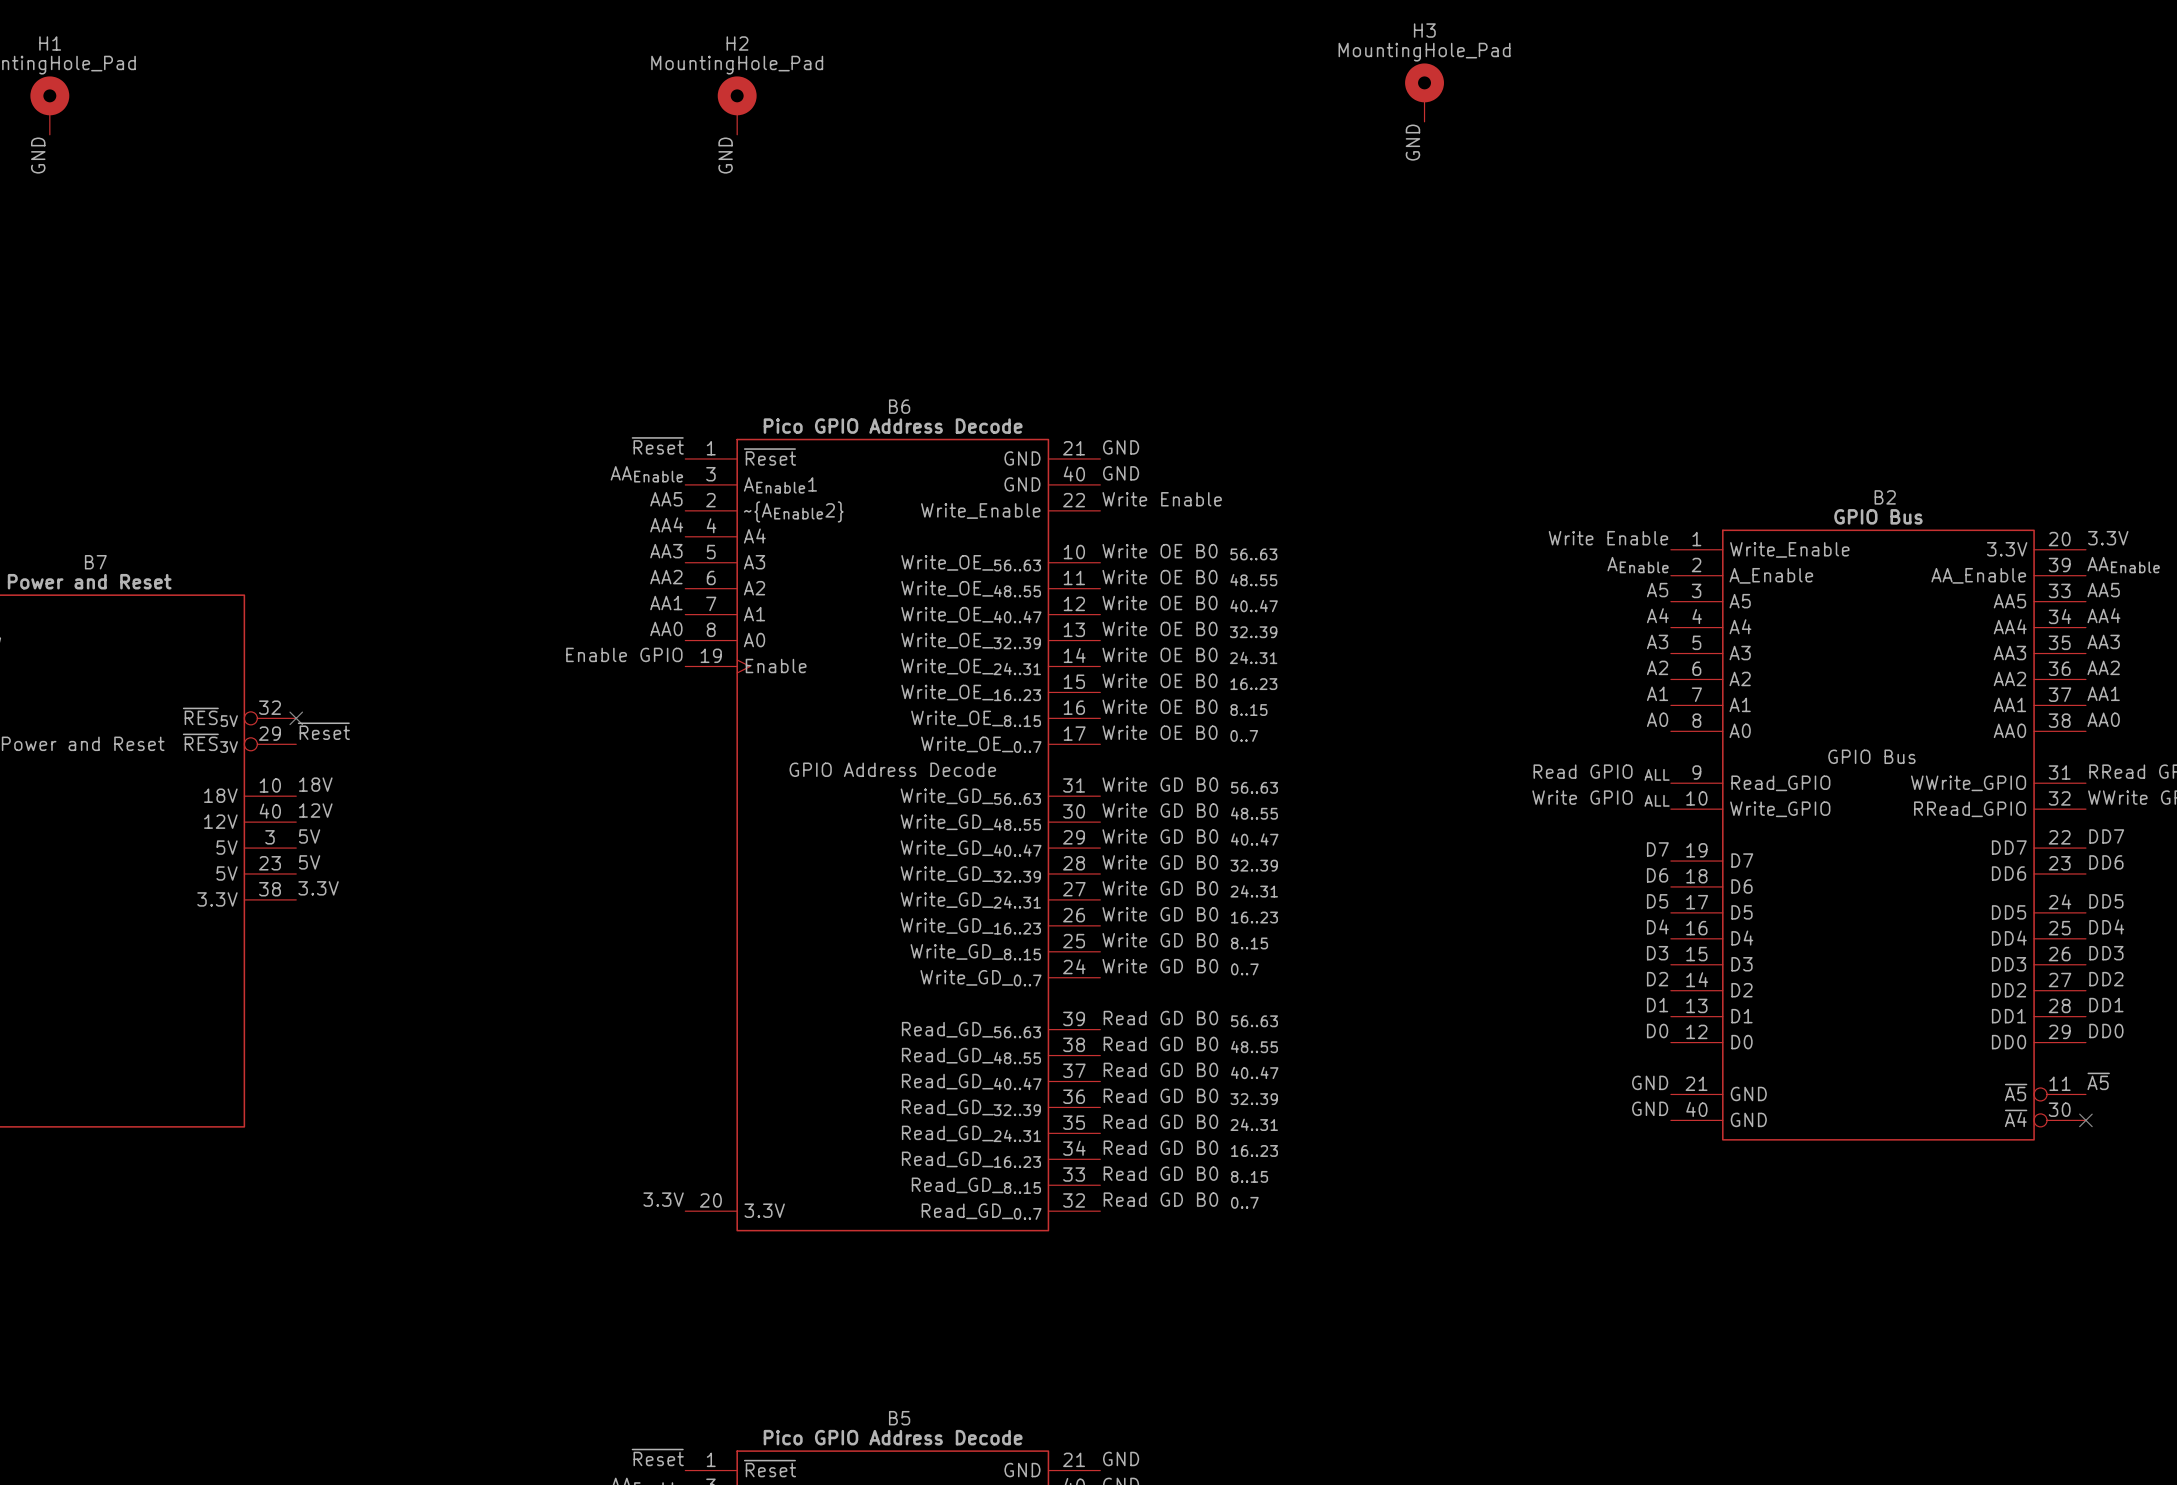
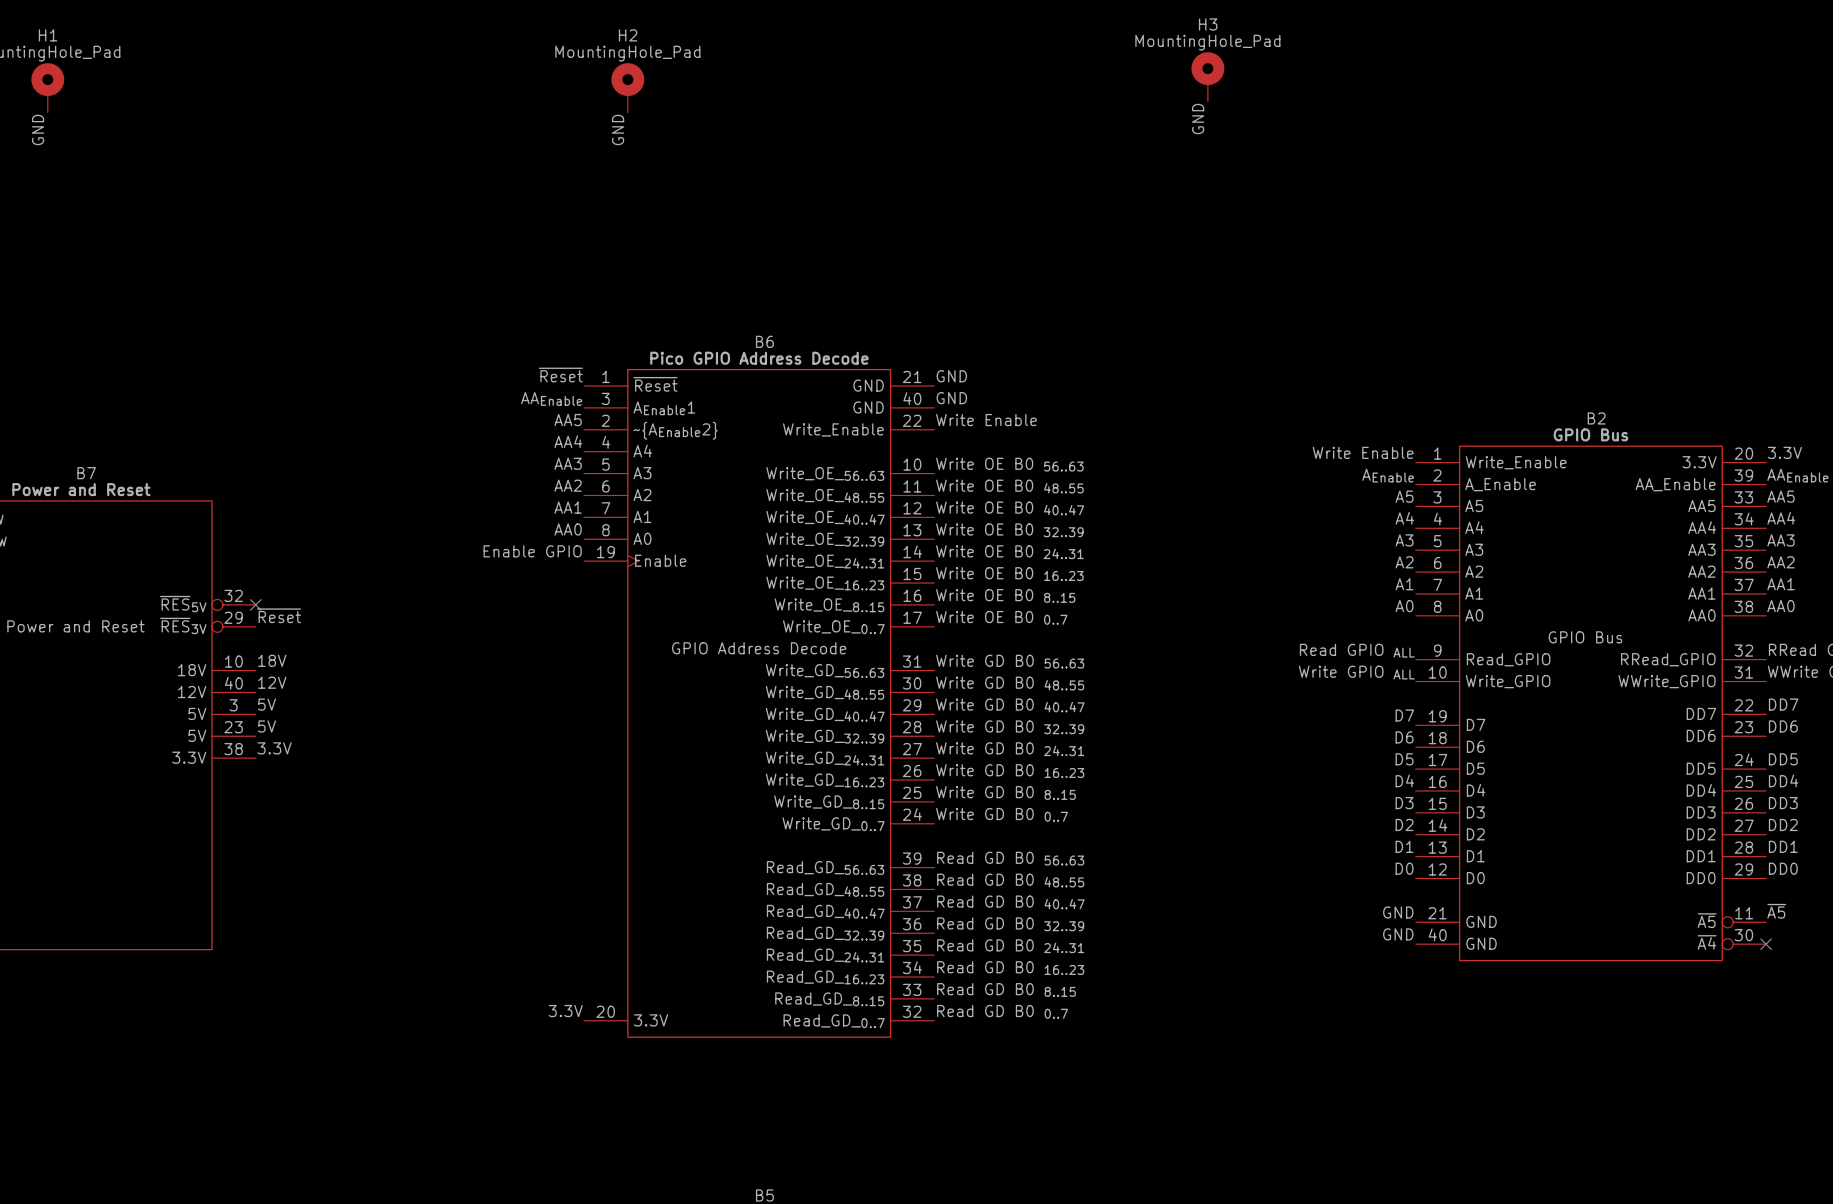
B2 pin number: 31 (2059, 772) -> 32 (1743, 650)
B2 pin name: WWrite_GPIO (1968, 783) -> RRead_GPIO (1668, 659)
B2 pin number: 32 (2059, 798) -> 31 (1743, 672)
B2 pin name: RRead_GPIO (1970, 809) -> WWrite_GPIO (1667, 681)

